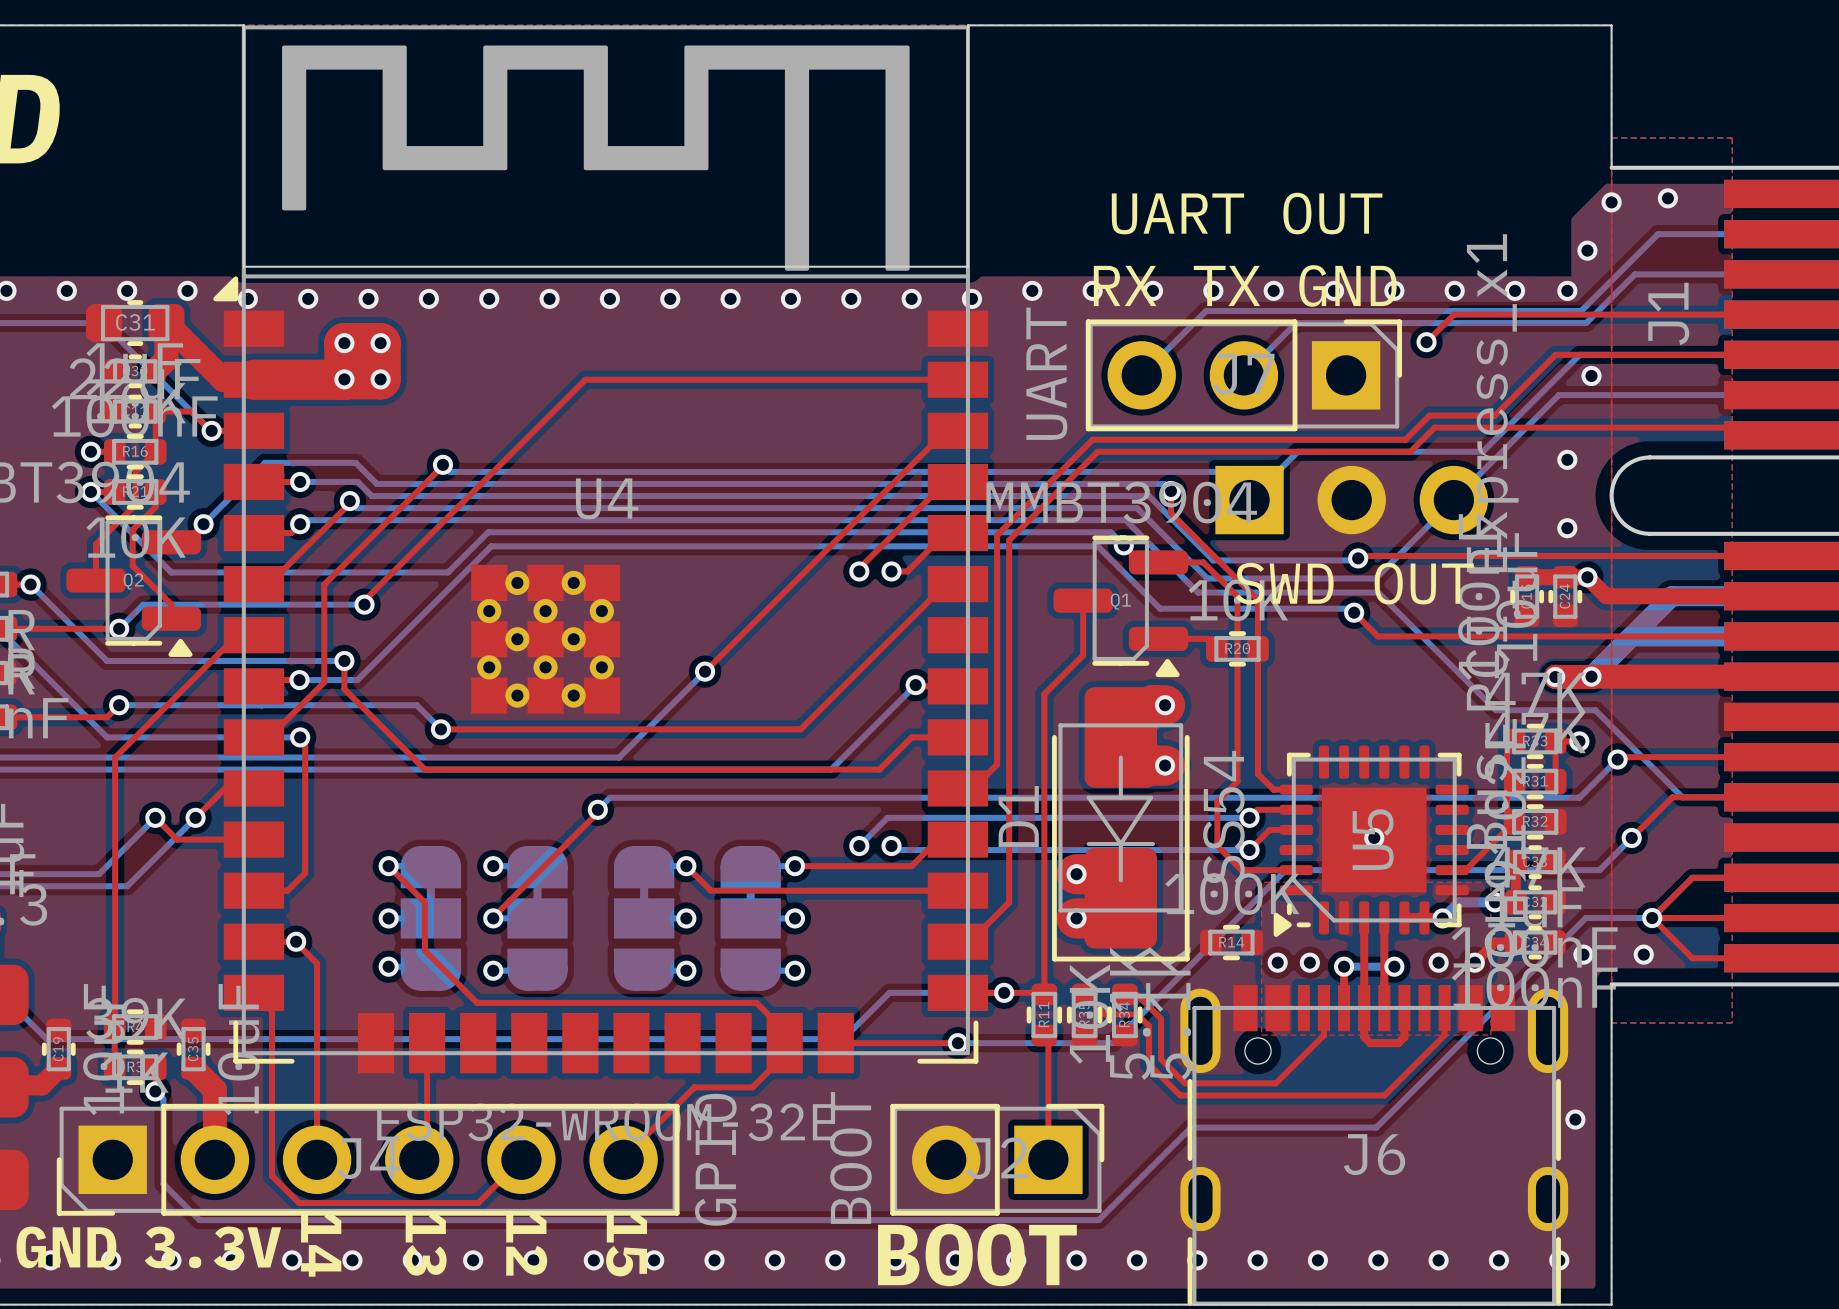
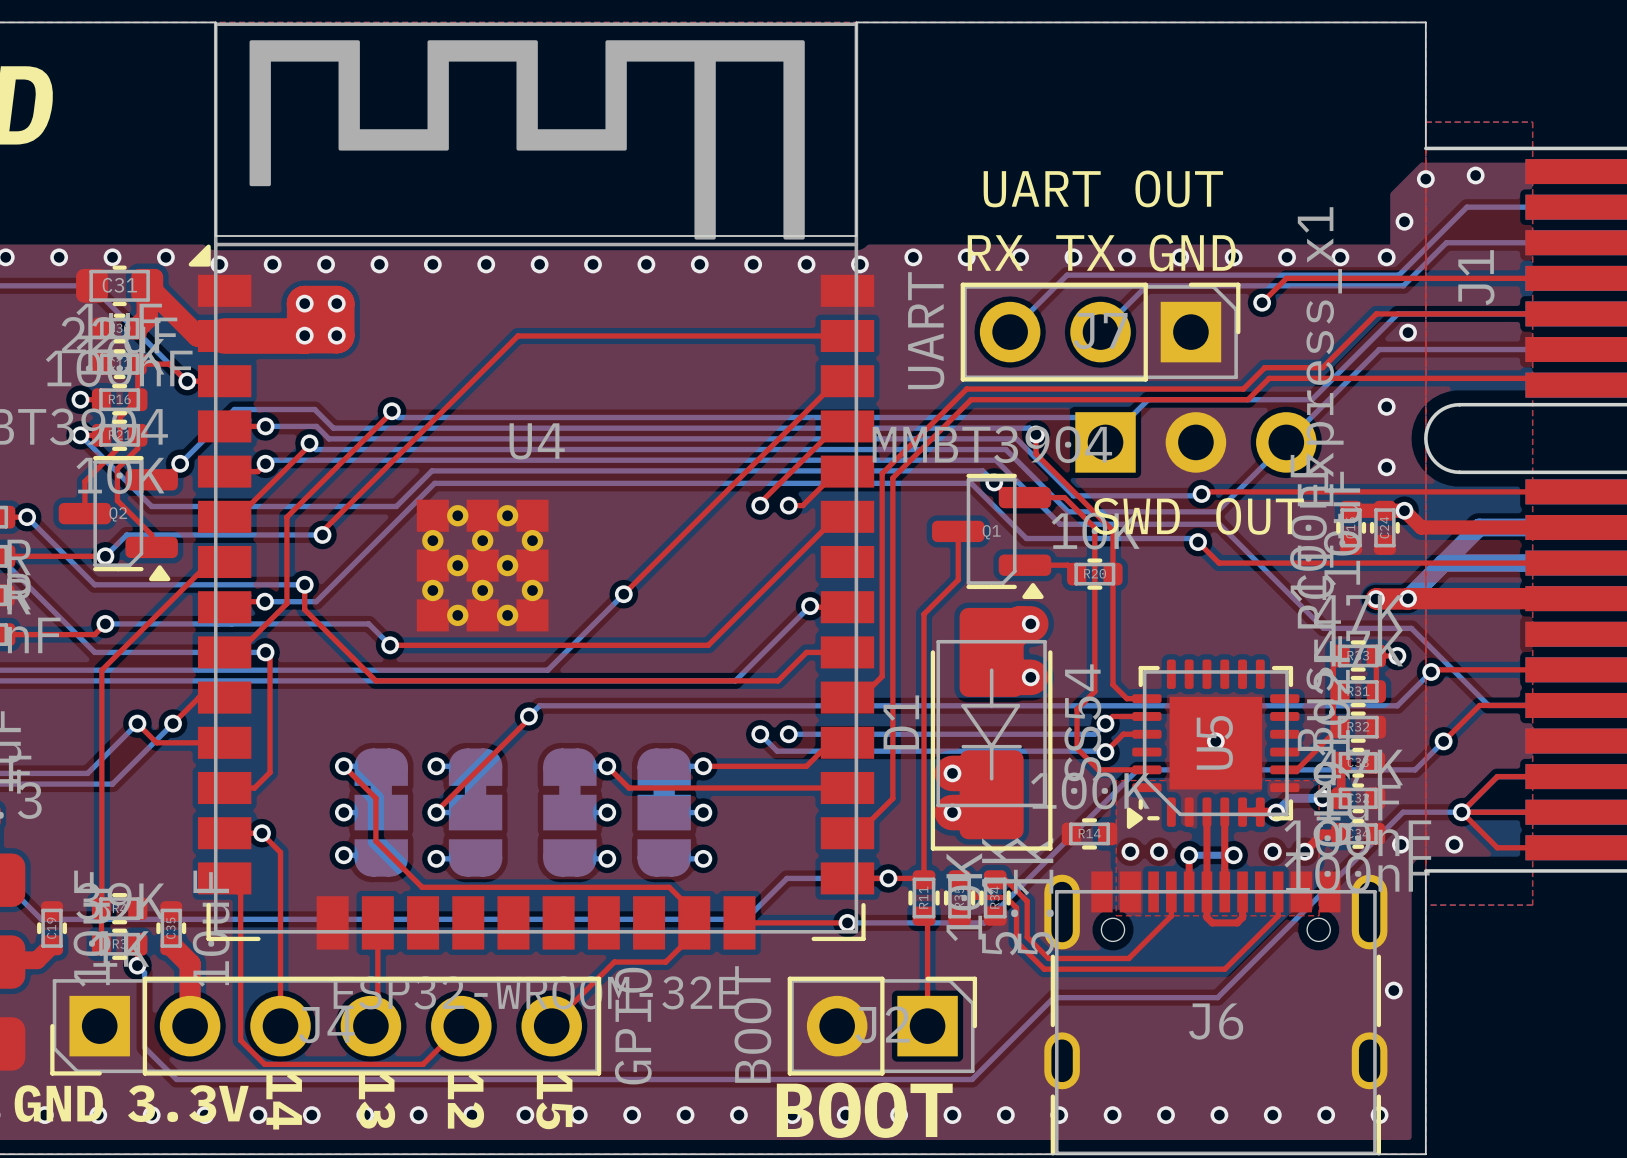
bottom track: (1249, 817) (887, 817) (859, 846) -> (1105, 723) (1094, 734) (788, 734)
part footprint: [400, 846, 462, 991] -> [354, 748, 408, 877]
part footprint: [507, 846, 568, 991] -> [448, 748, 503, 877]
part footprint: [613, 846, 675, 991] -> [543, 748, 597, 877]
part footprint: [720, 846, 781, 991] -> [637, 748, 691, 877]
via position: (859, 846) -> (760, 734)
bottom track: (891, 846) (895, 850) (1249, 850) -> (760, 734) (777, 751) (1103, 751) (1105, 752)
via position: (891, 846) -> (788, 734)

